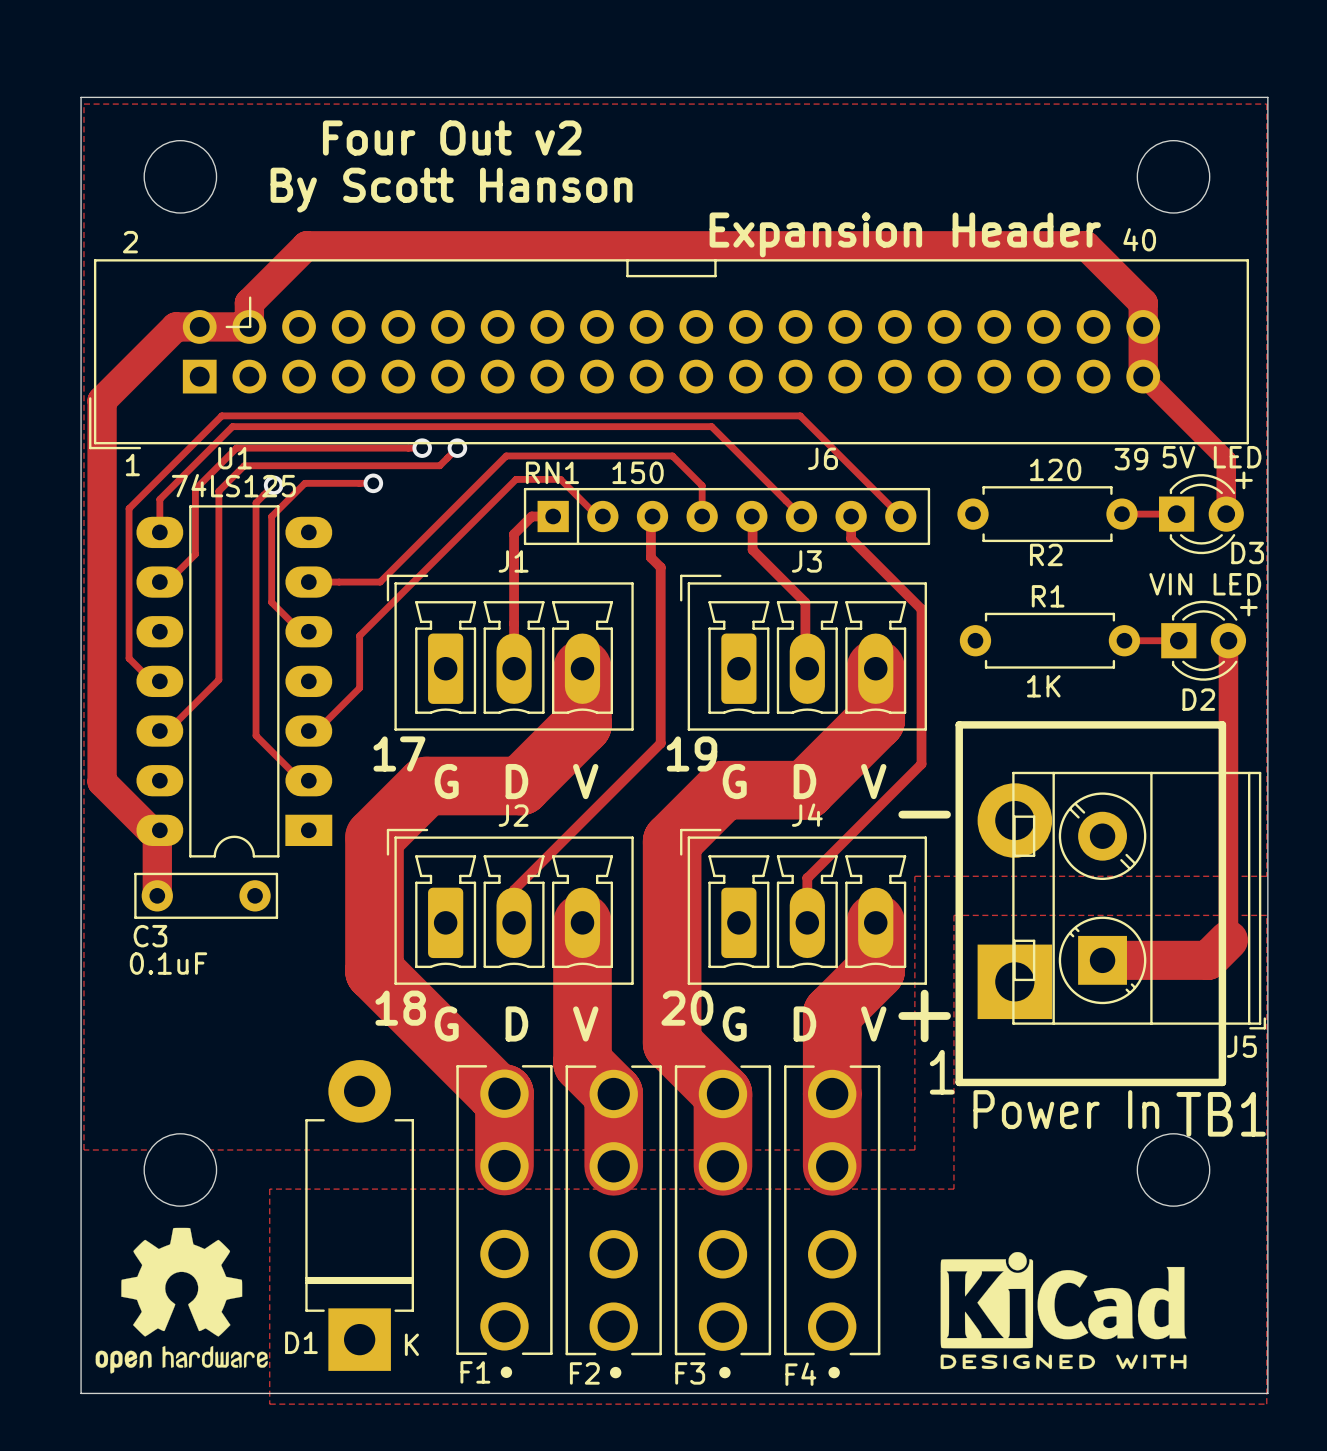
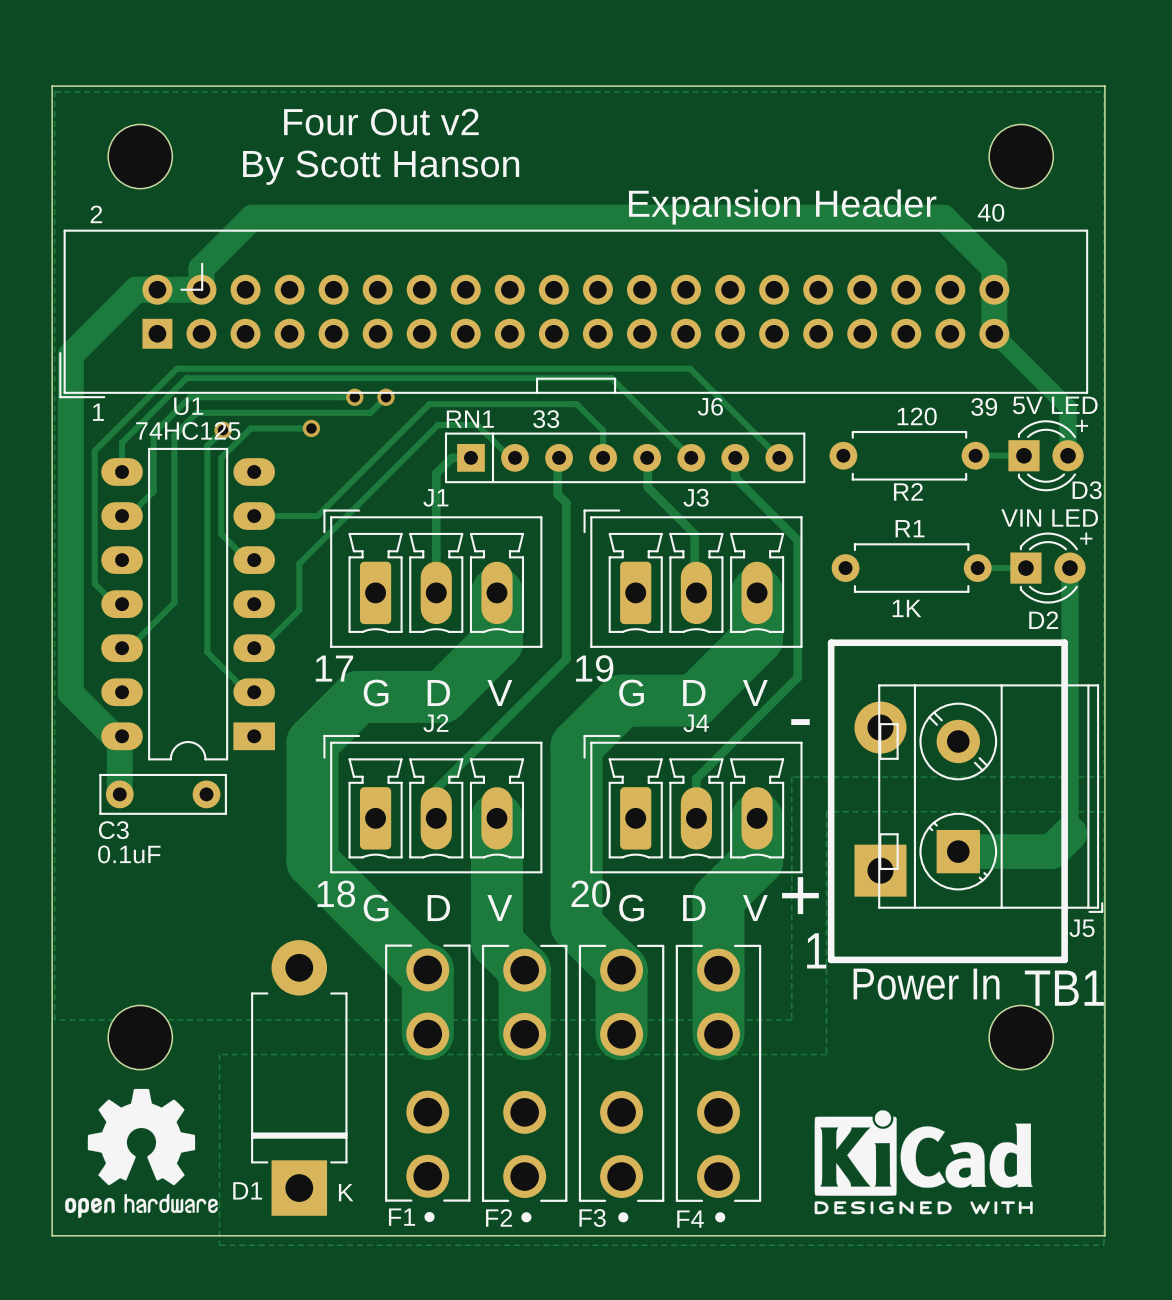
line: (627, 260) (627, 276) (715, 276) (715, 260) -> none
line: none -> (537, 392) (537, 378) (615, 378) (615, 392)
RN1 value: 150 (638, 472) -> 33 (546, 419)
U1 value: 74LS125 (233, 485) -> 74HC125 (188, 430)
TB1 footprint: [955, 721, 1227, 1087] -> [827, 639, 1068, 964]

